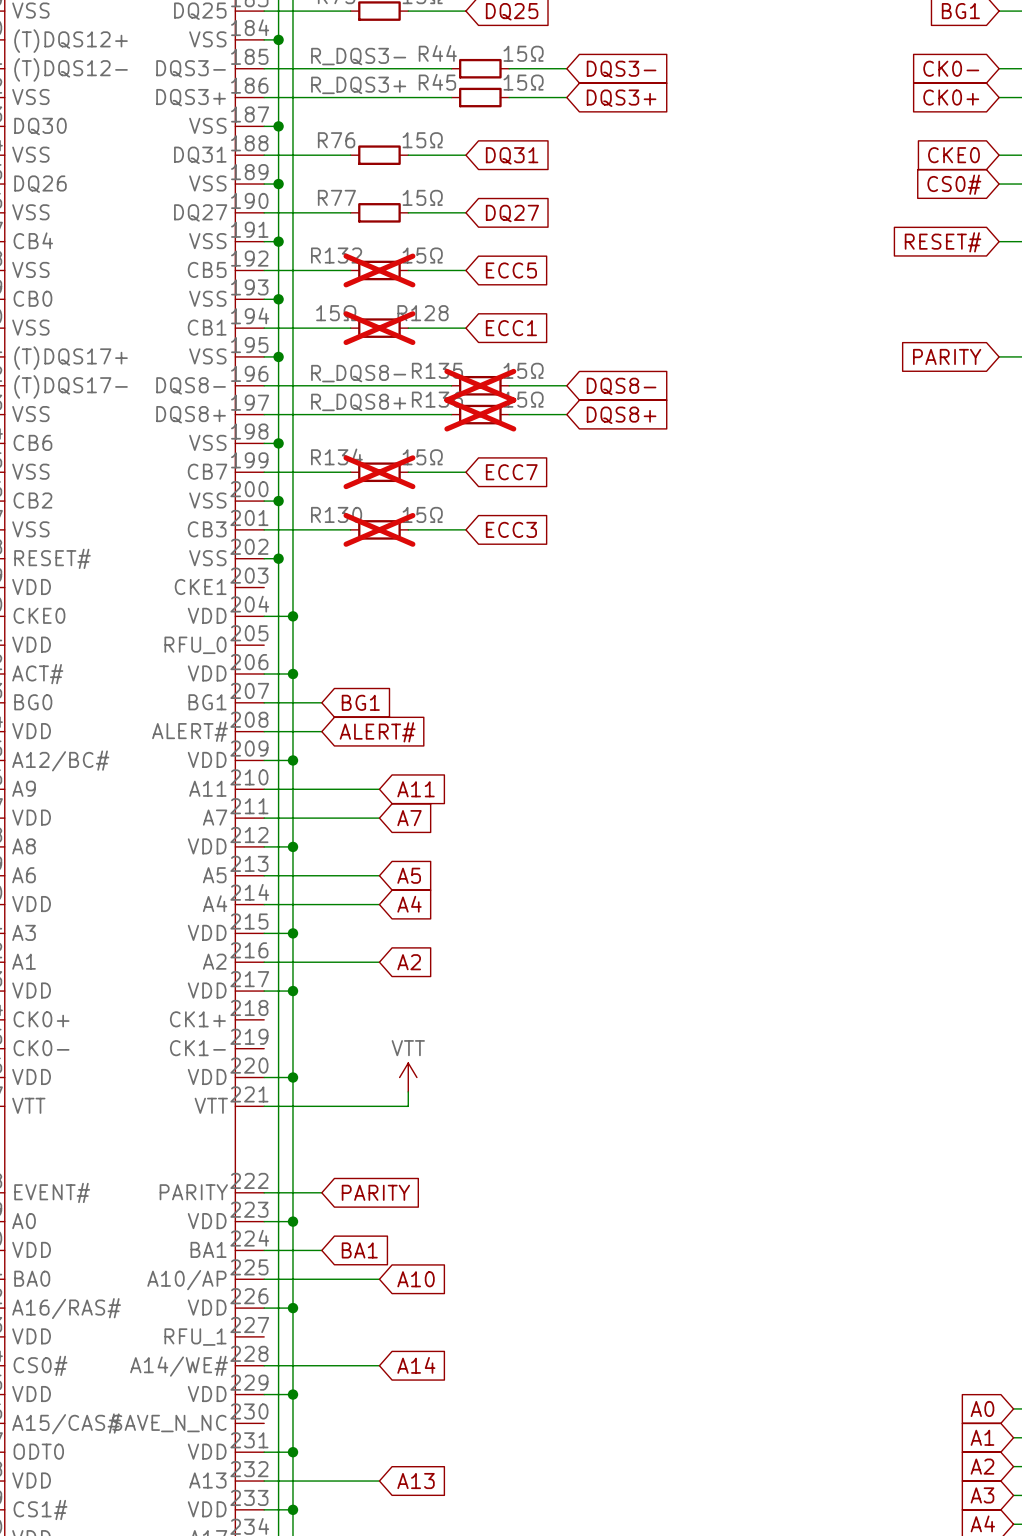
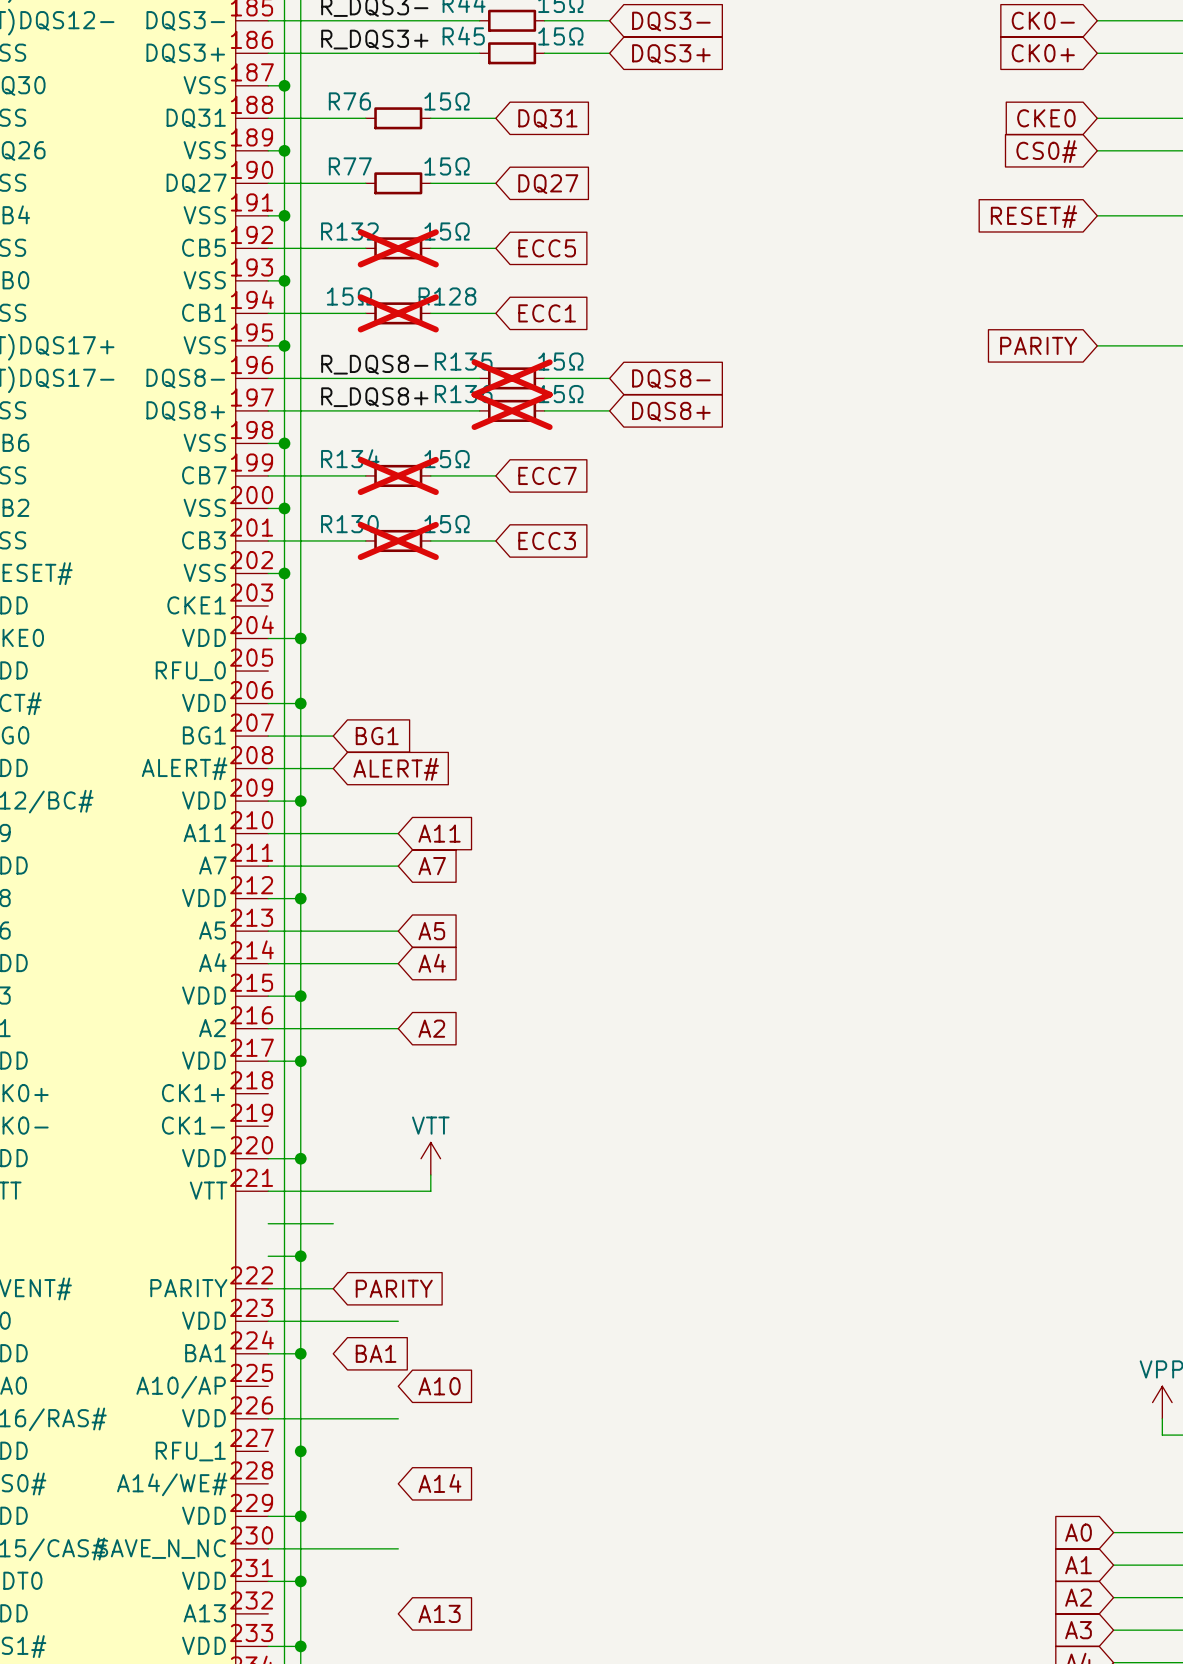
wire: none -> (268, 1223) (333, 1223)
junction: none -> (300, 1256)
wire: none -> (300, 1321) (398, 1321)
junction: (292, 1221) -> none
wire: (292, 1250) (321, 1250) -> (268, 1256) (300, 1256)
junction: none -> (300, 1353)
wire: (264, 1279) (379, 1279) -> none
wire: none -> (300, 1418) (398, 1418)
junction: (292, 1308) -> none
junction: none -> (300, 1451)
wire: (264, 1365) (379, 1365) -> none
wire: (264, 1481) (379, 1481) -> (268, 1548) (398, 1548)

